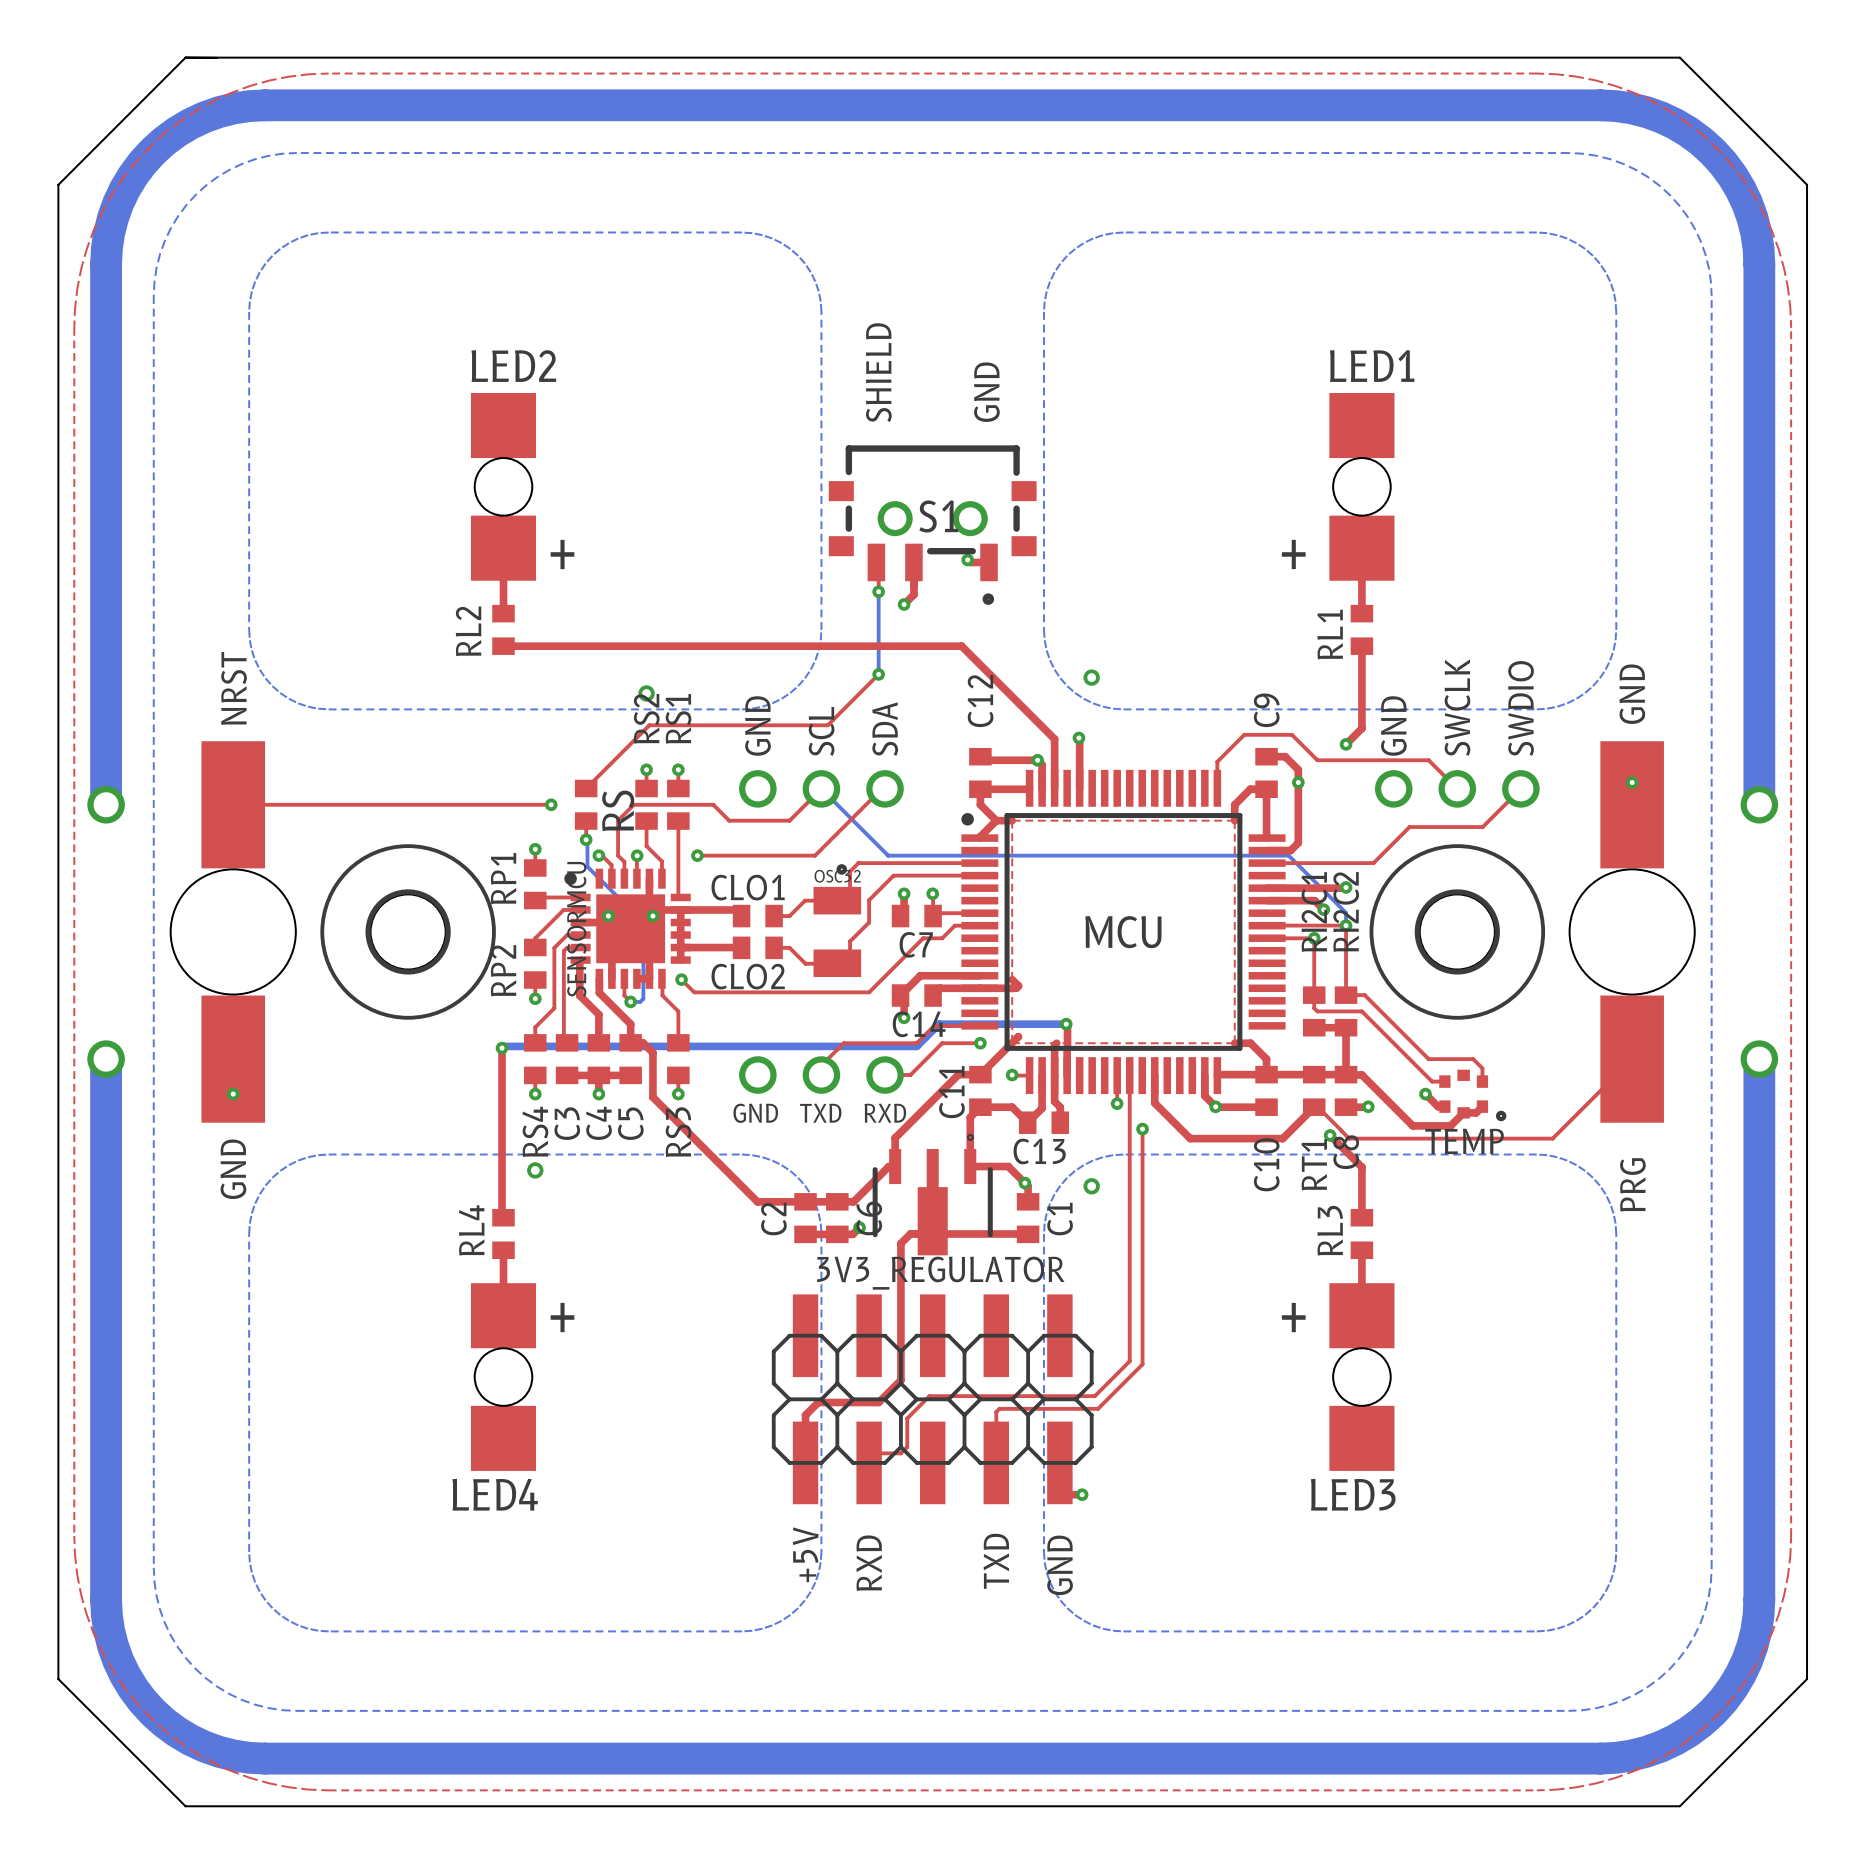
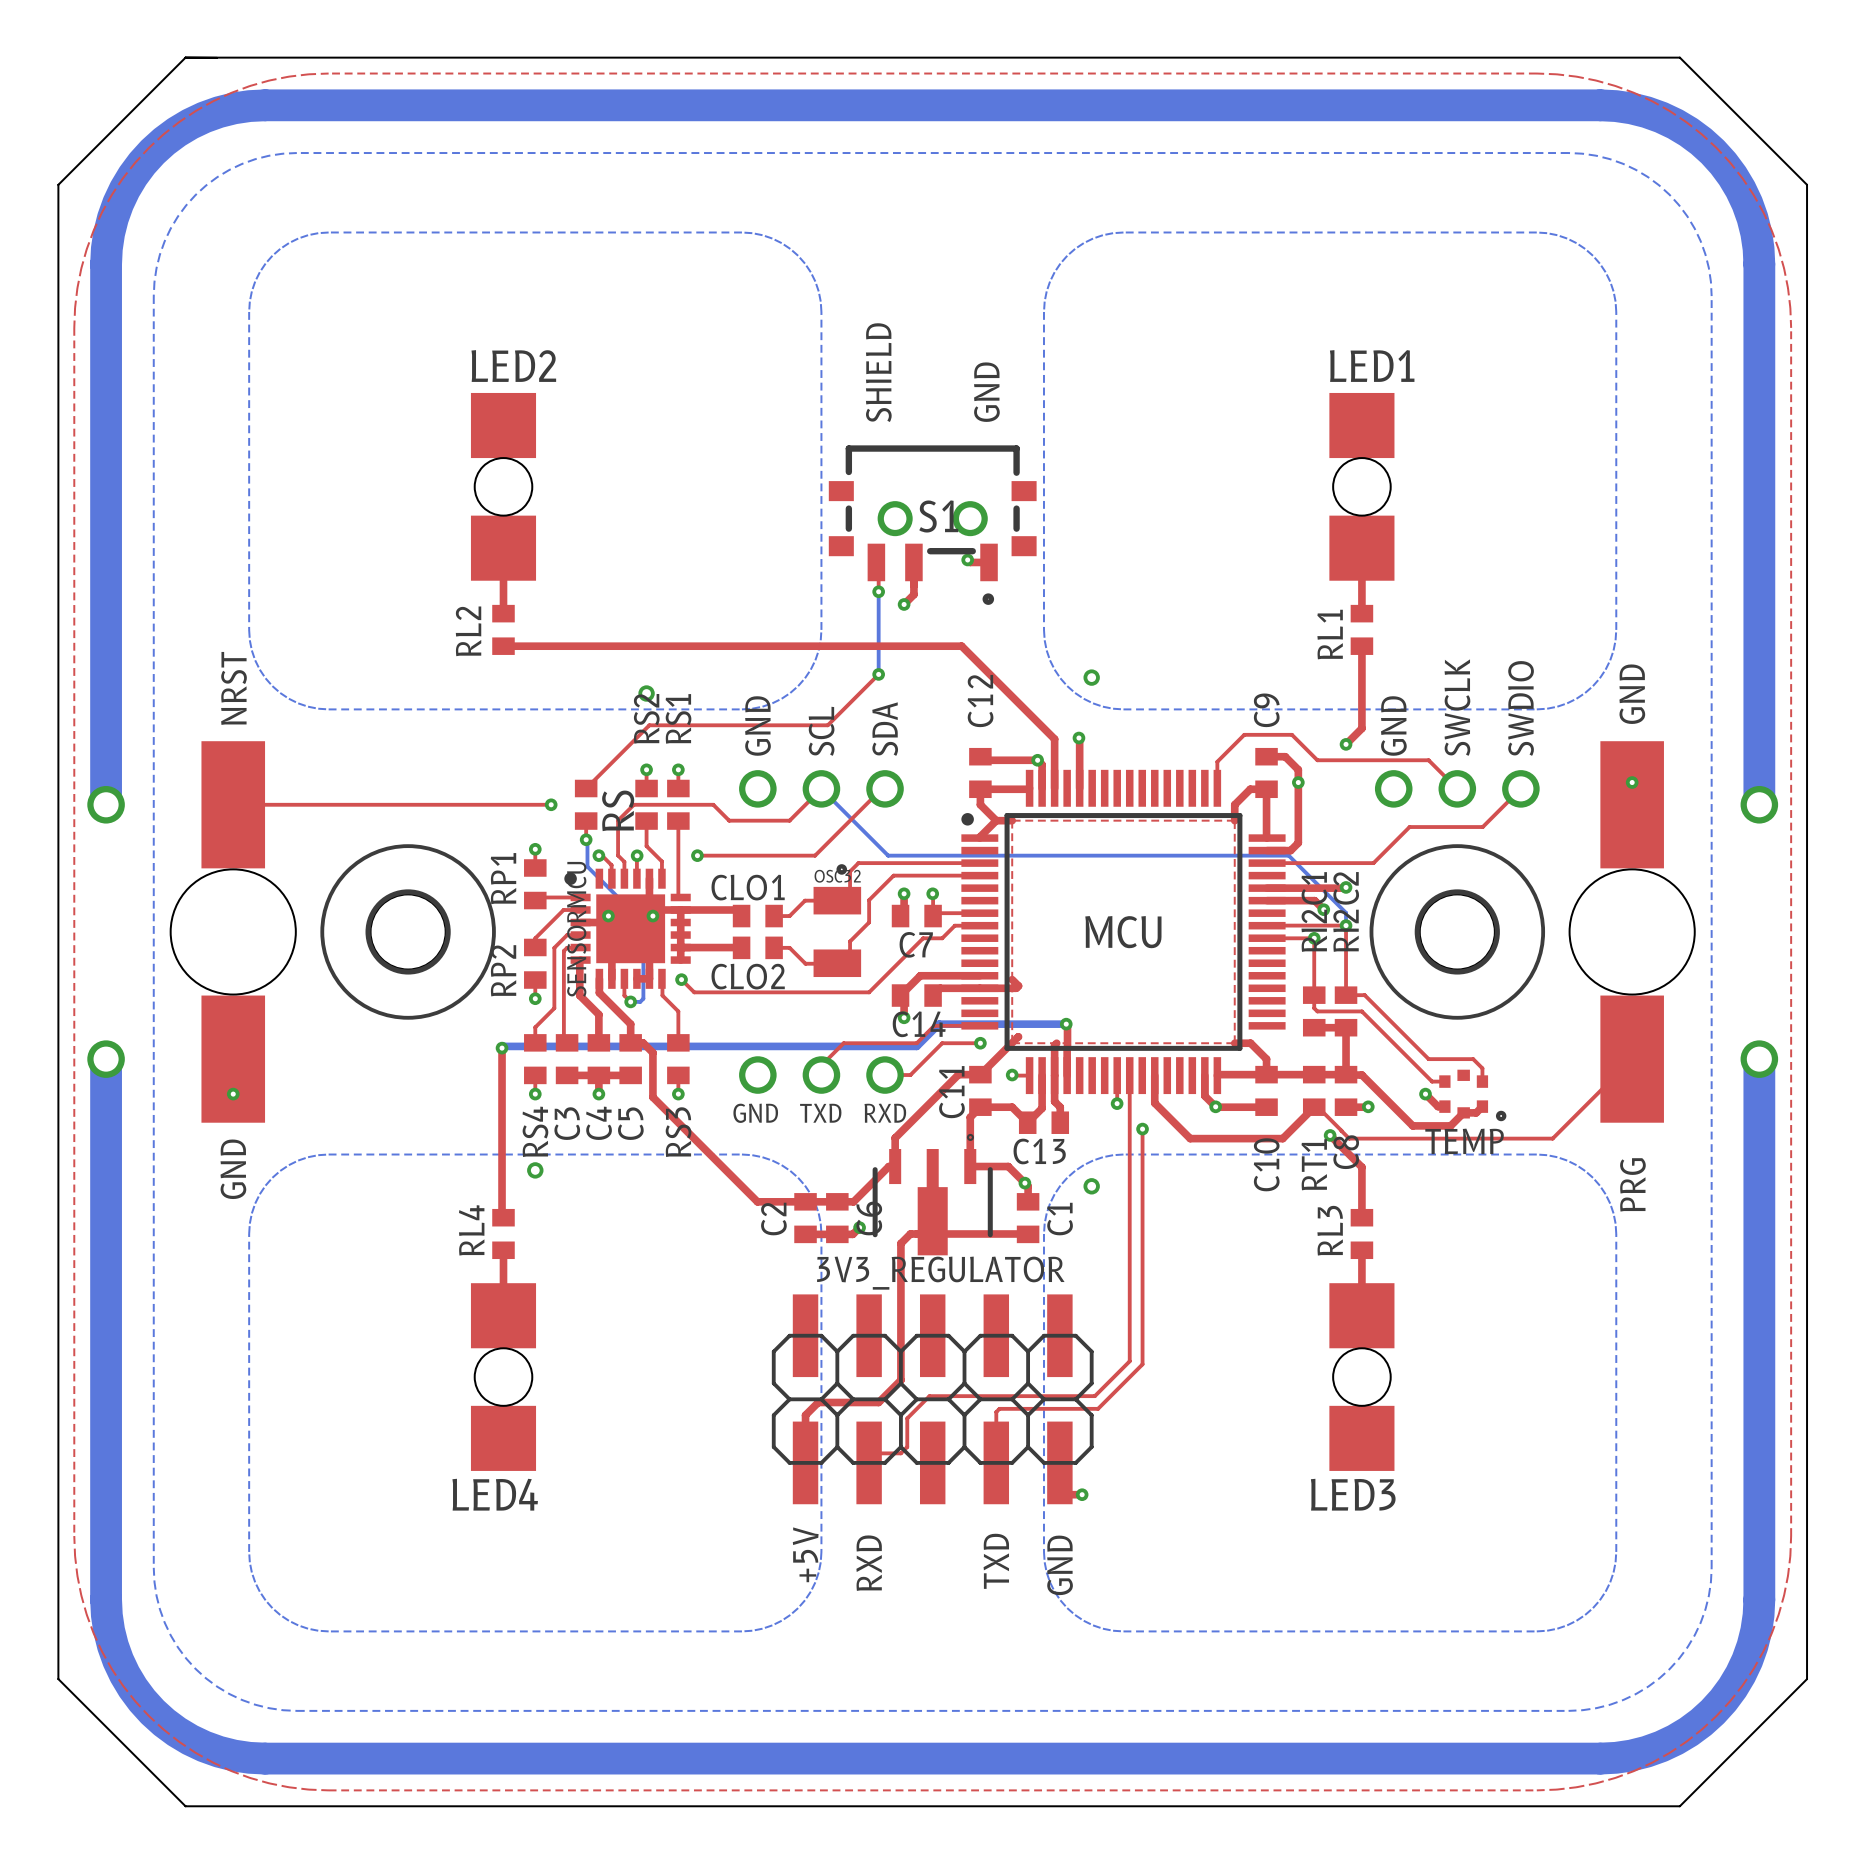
text: + (562, 554) -> none
text: + (1293, 554) -> none
text: + (562, 1317) -> none
text: + (1293, 1317) -> none

